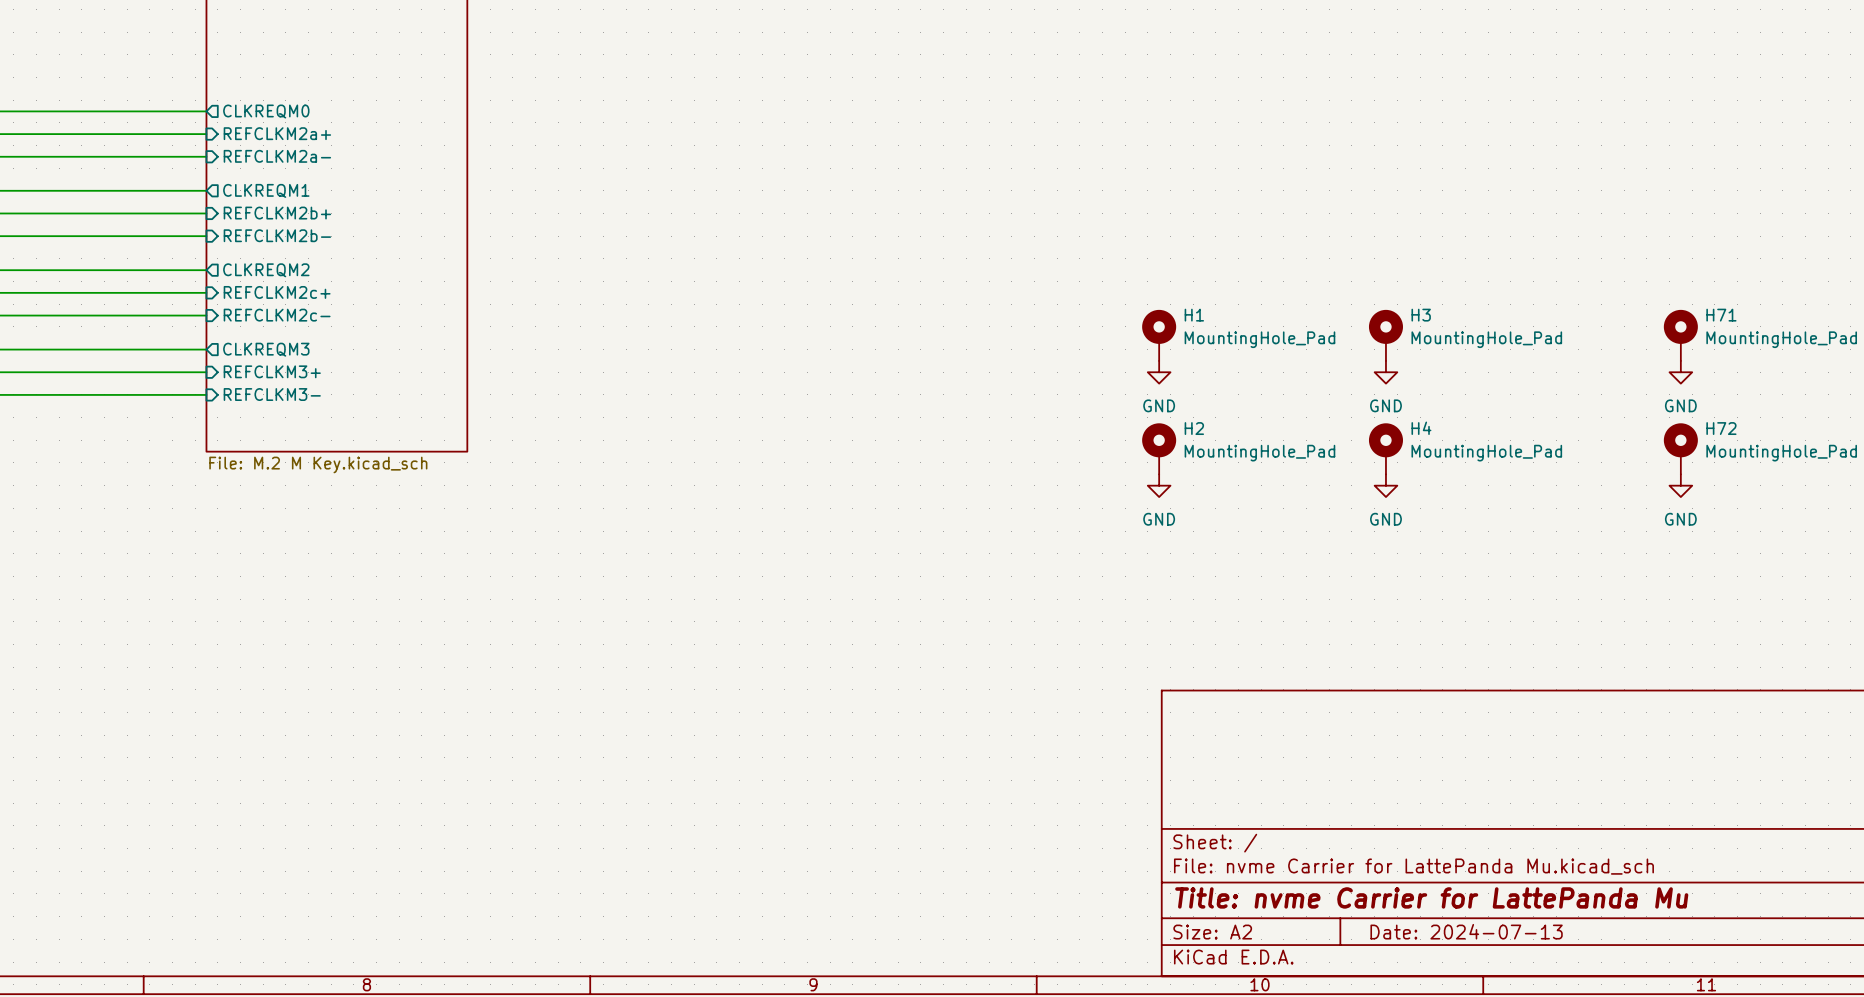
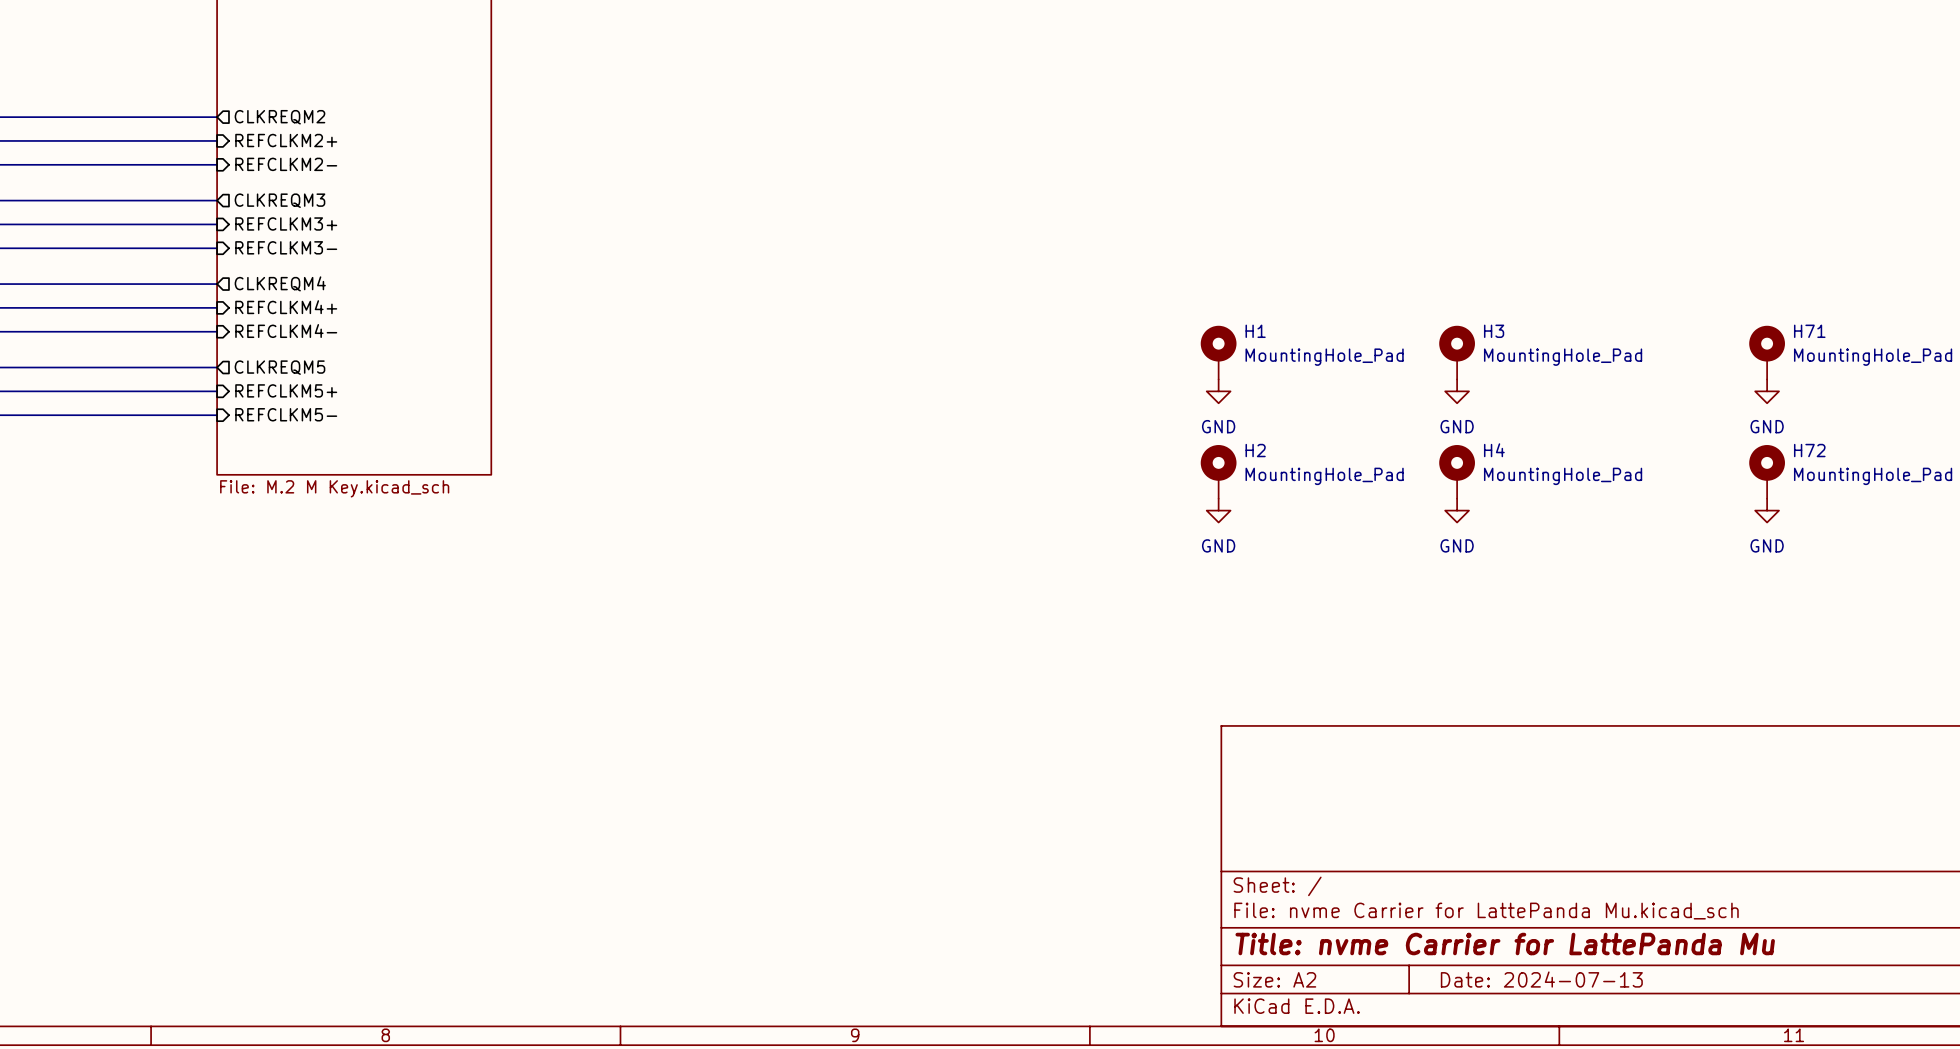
sheet pin: CLKREQM0 (266, 111) -> CLKREQM2 (279, 117)
sheet pin: REFCLKM2a+ (277, 133) -> REFCLKM2+ (286, 140)
sheet pin: REFCLKM2a- (277, 156) -> REFCLKM2- (286, 164)
sheet pin: CLKREQM1 (266, 190) -> CLKREQM3 (279, 200)
sheet pin: REFCLKM2b+ (277, 213) -> REFCLKM3+ (286, 223)
sheet pin: REFCLKM2b- (277, 235) -> REFCLKM3- (286, 247)
sheet pin: CLKREQM2 (266, 270) -> CLKREQM4 (280, 283)
sheet pin: REFCLKM2c+ (277, 292) -> REFCLKM4+ (286, 307)
sheet pin: REFCLKM2c- (277, 315) -> REFCLKM4- (286, 331)
sheet pin: CLKREQM3 (266, 349) -> CLKREQM5 (279, 367)
sheet pin: REFCLKM3+ (272, 371) -> REFCLKM5+ (286, 390)
sheet pin: REFCLKM3- (272, 394) -> REFCLKM5- (286, 414)

